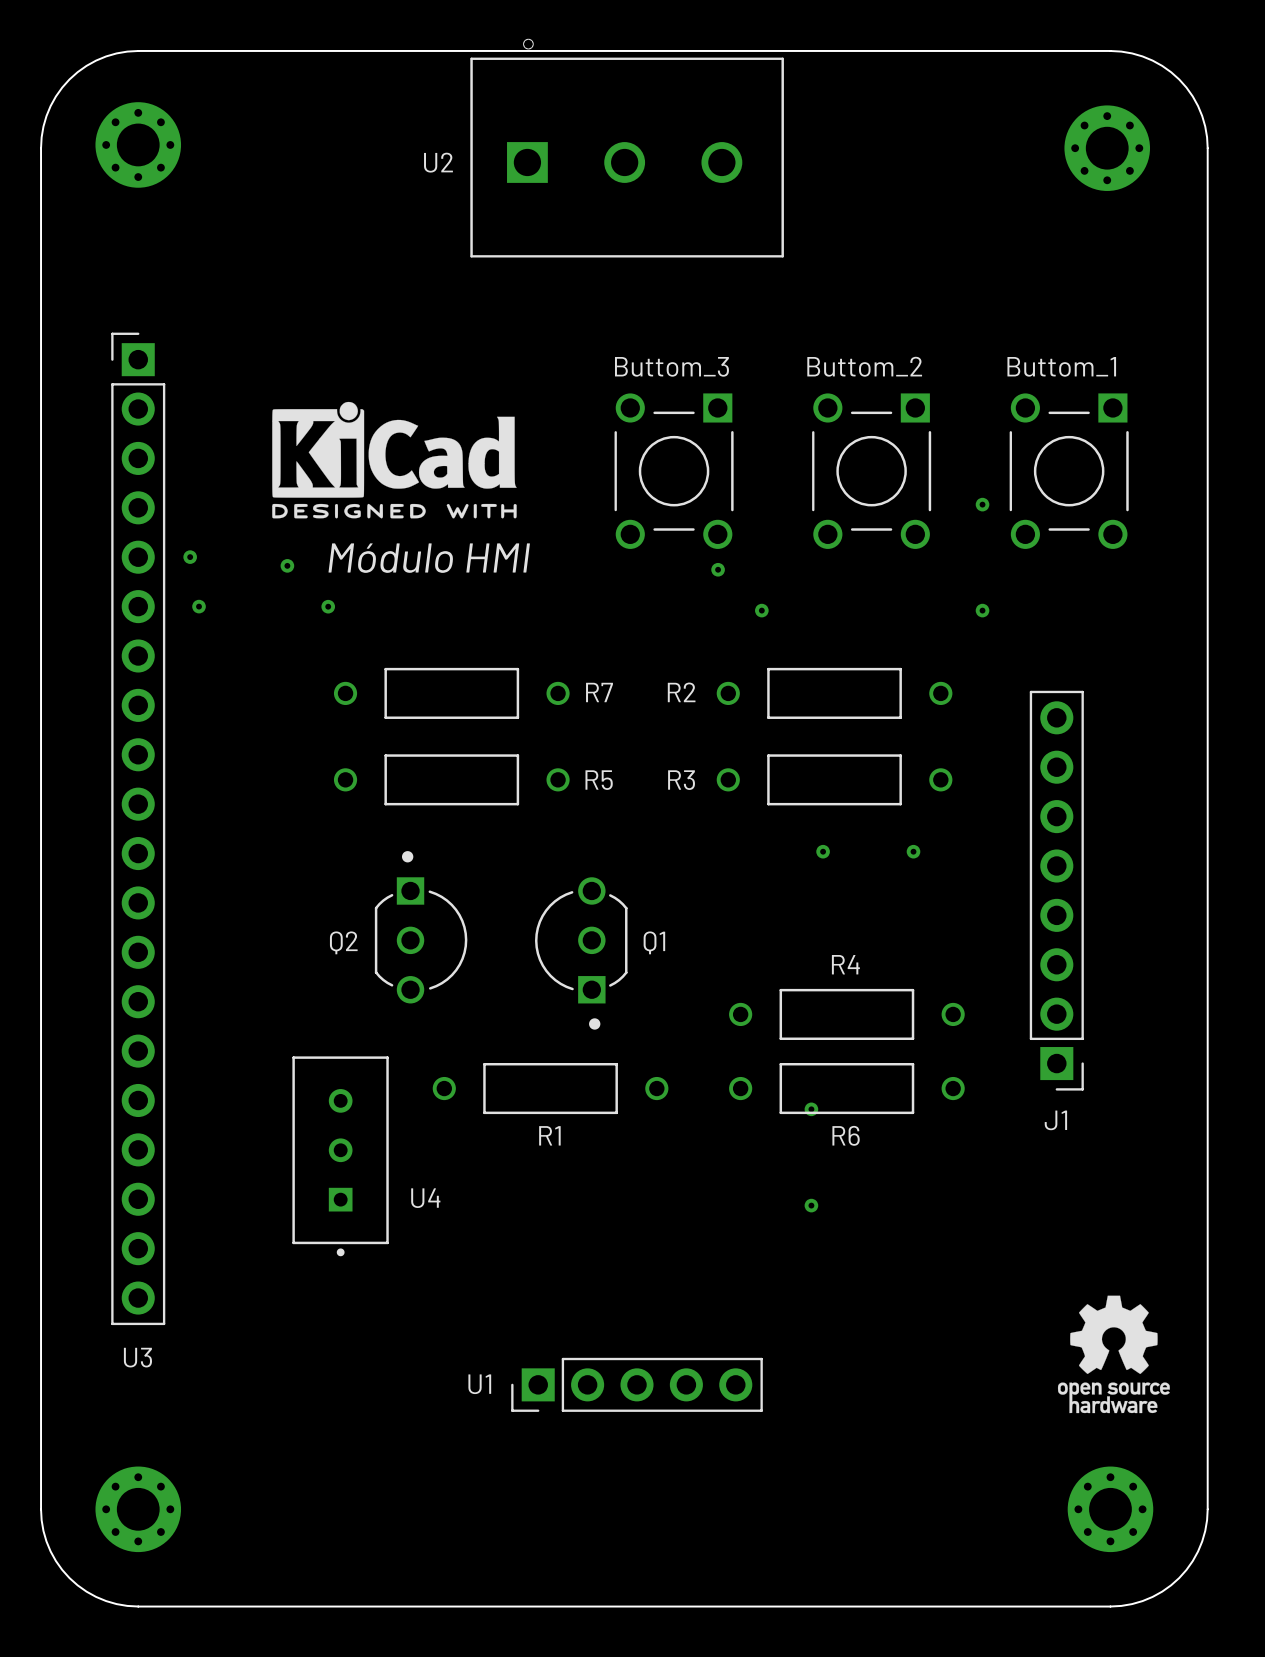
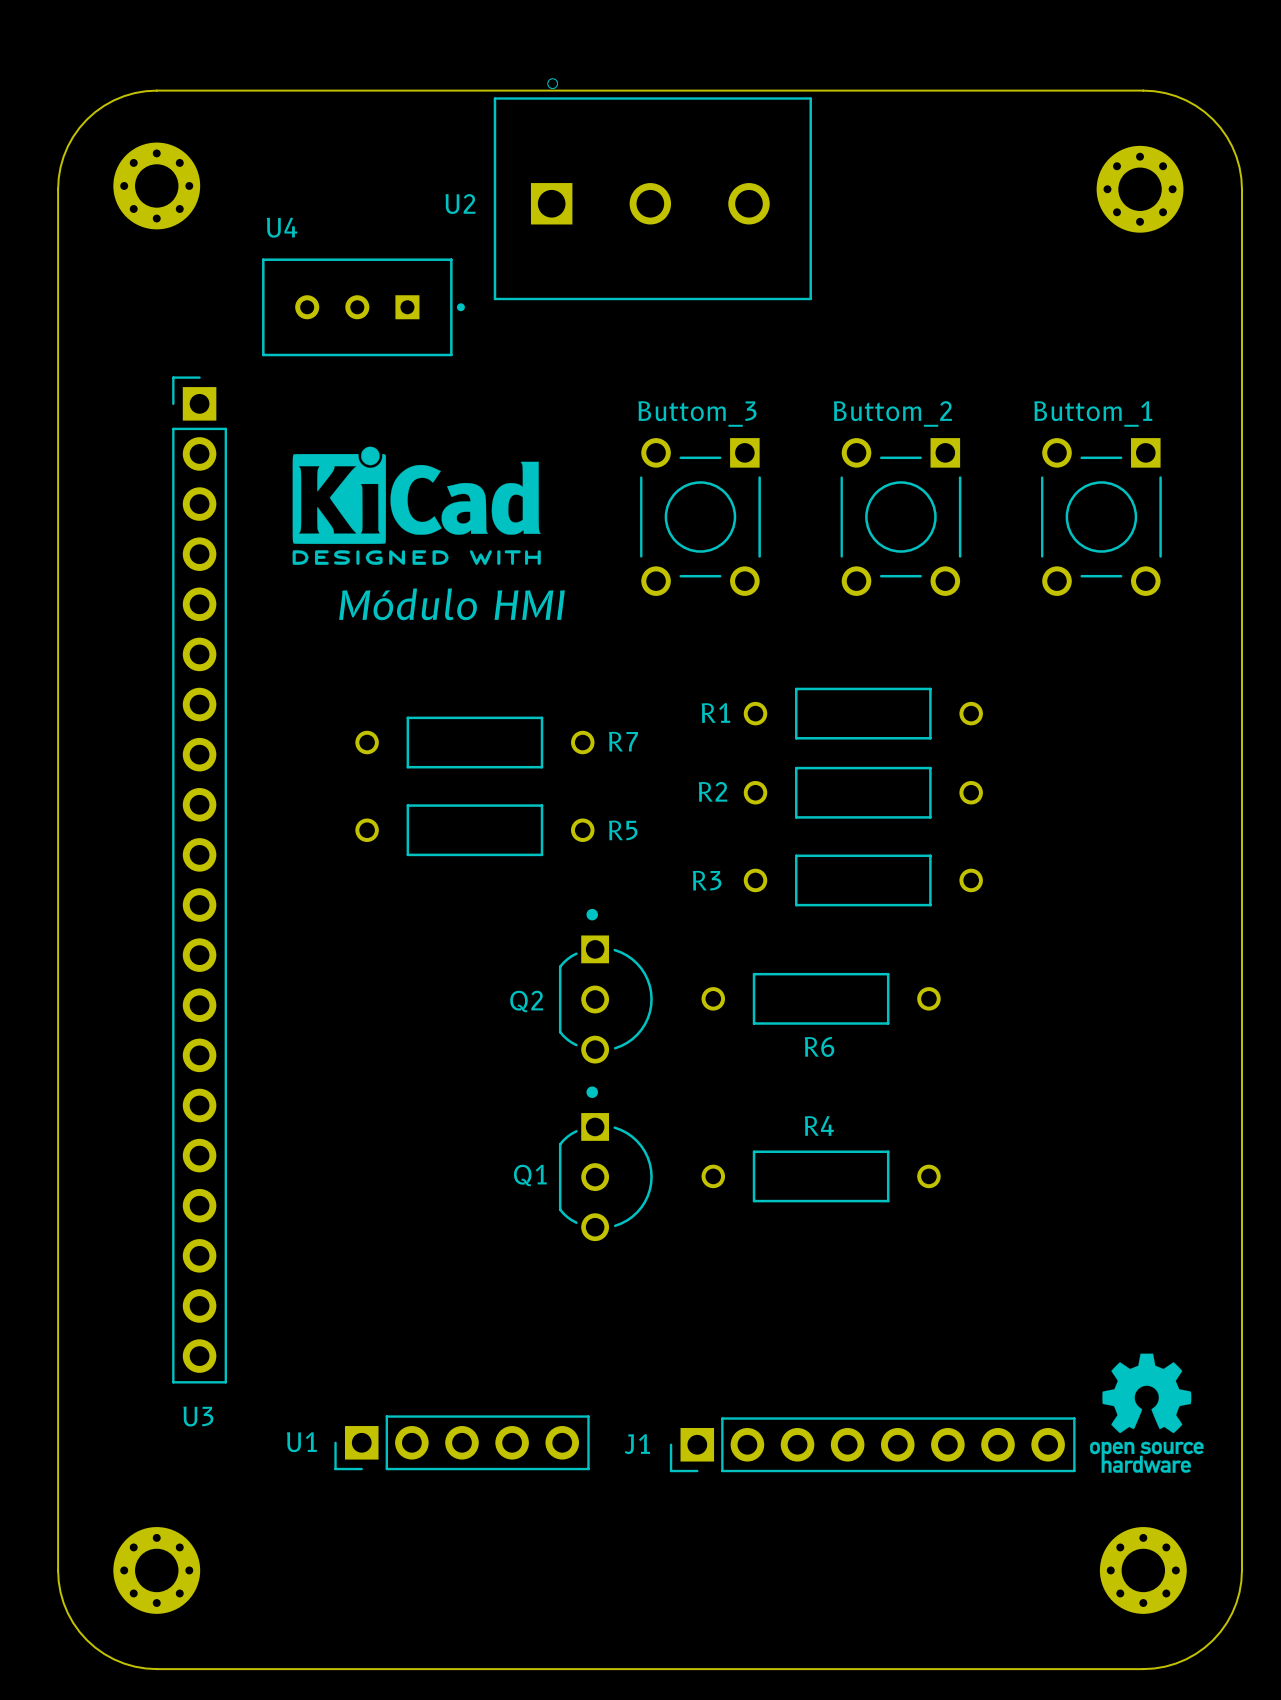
via: (982, 504) -> none
via: (190, 557) -> none
via: (287, 565) -> none
via: (718, 569) -> none
via: (199, 606) -> none
via: (328, 606) -> none
via: (761, 610) -> none
via: (982, 610) -> none
R2 name position: R2 (681, 692) -> R2 (712, 791)
R2 position: (834, 693) -> (863, 792)
R3 position: (834, 779) -> (863, 880)
U3 position: (138, 828) -> (199, 879)
via: (823, 851) -> none
via: (913, 851) -> none
J1 rotation: 0° (1056, 890) -> 90° clockwise (872, 1444)
J1 position: (1056, 890) -> (872, 1444)
Q2 position: (421, 927) -> (605, 986)
Q1 rotation: 0° (581, 953) -> 180° (605, 1163)
Q1 position: (581, 953) -> (605, 1163)
R4 position: (846, 1014) -> (821, 1176)
R1 position: (550, 1088) -> (863, 713)
R6 position: (846, 1088) -> (821, 998)
via: (811, 1109) -> none
R1 name position: R1 (549, 1135) -> R1 (715, 712)
U4 rotation: 0° (340, 1156) -> 90° counterclockwise (363, 307)
U4 position: (340, 1156) -> (363, 307)
U4 name position: U4 (425, 1198) -> U4 (282, 227)
via: (811, 1205) -> none
U1 position: (637, 1384) -> (461, 1442)

